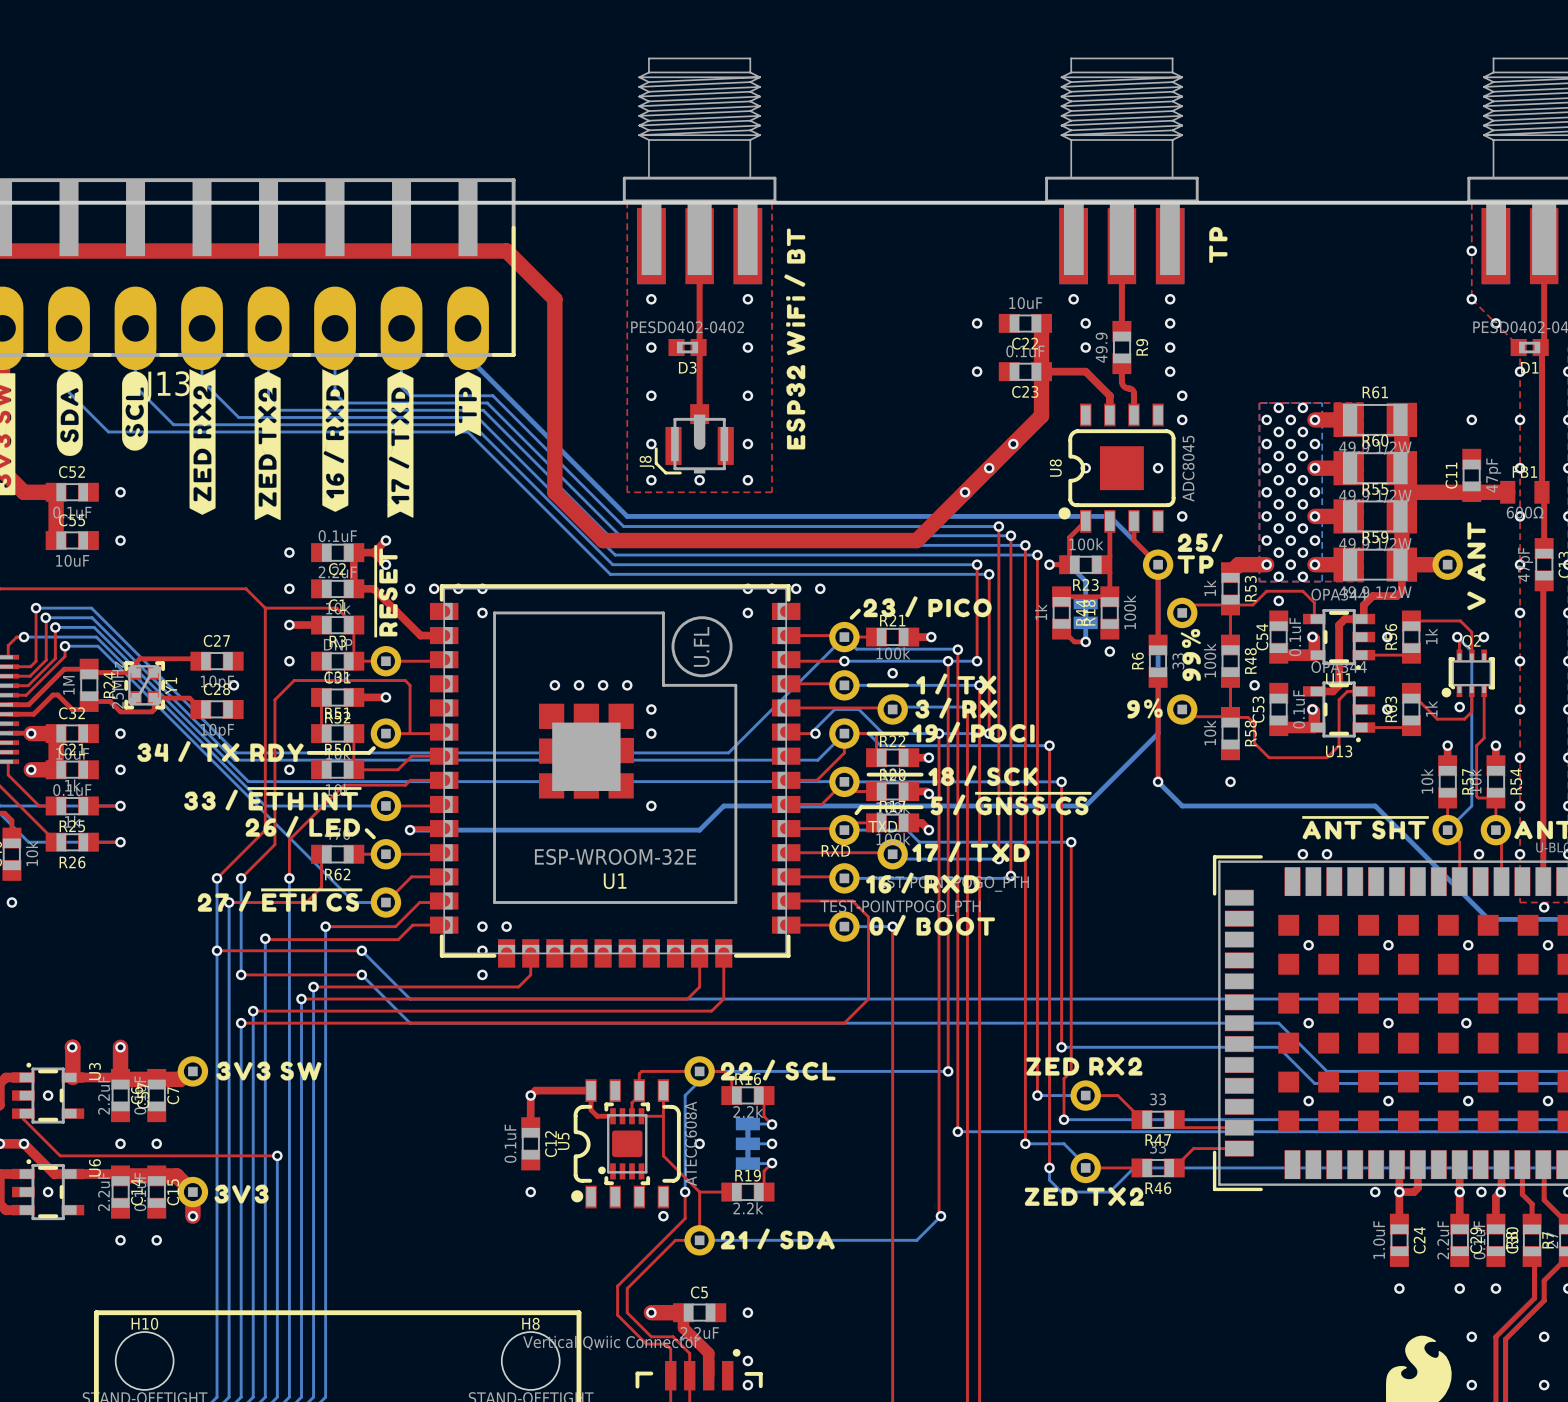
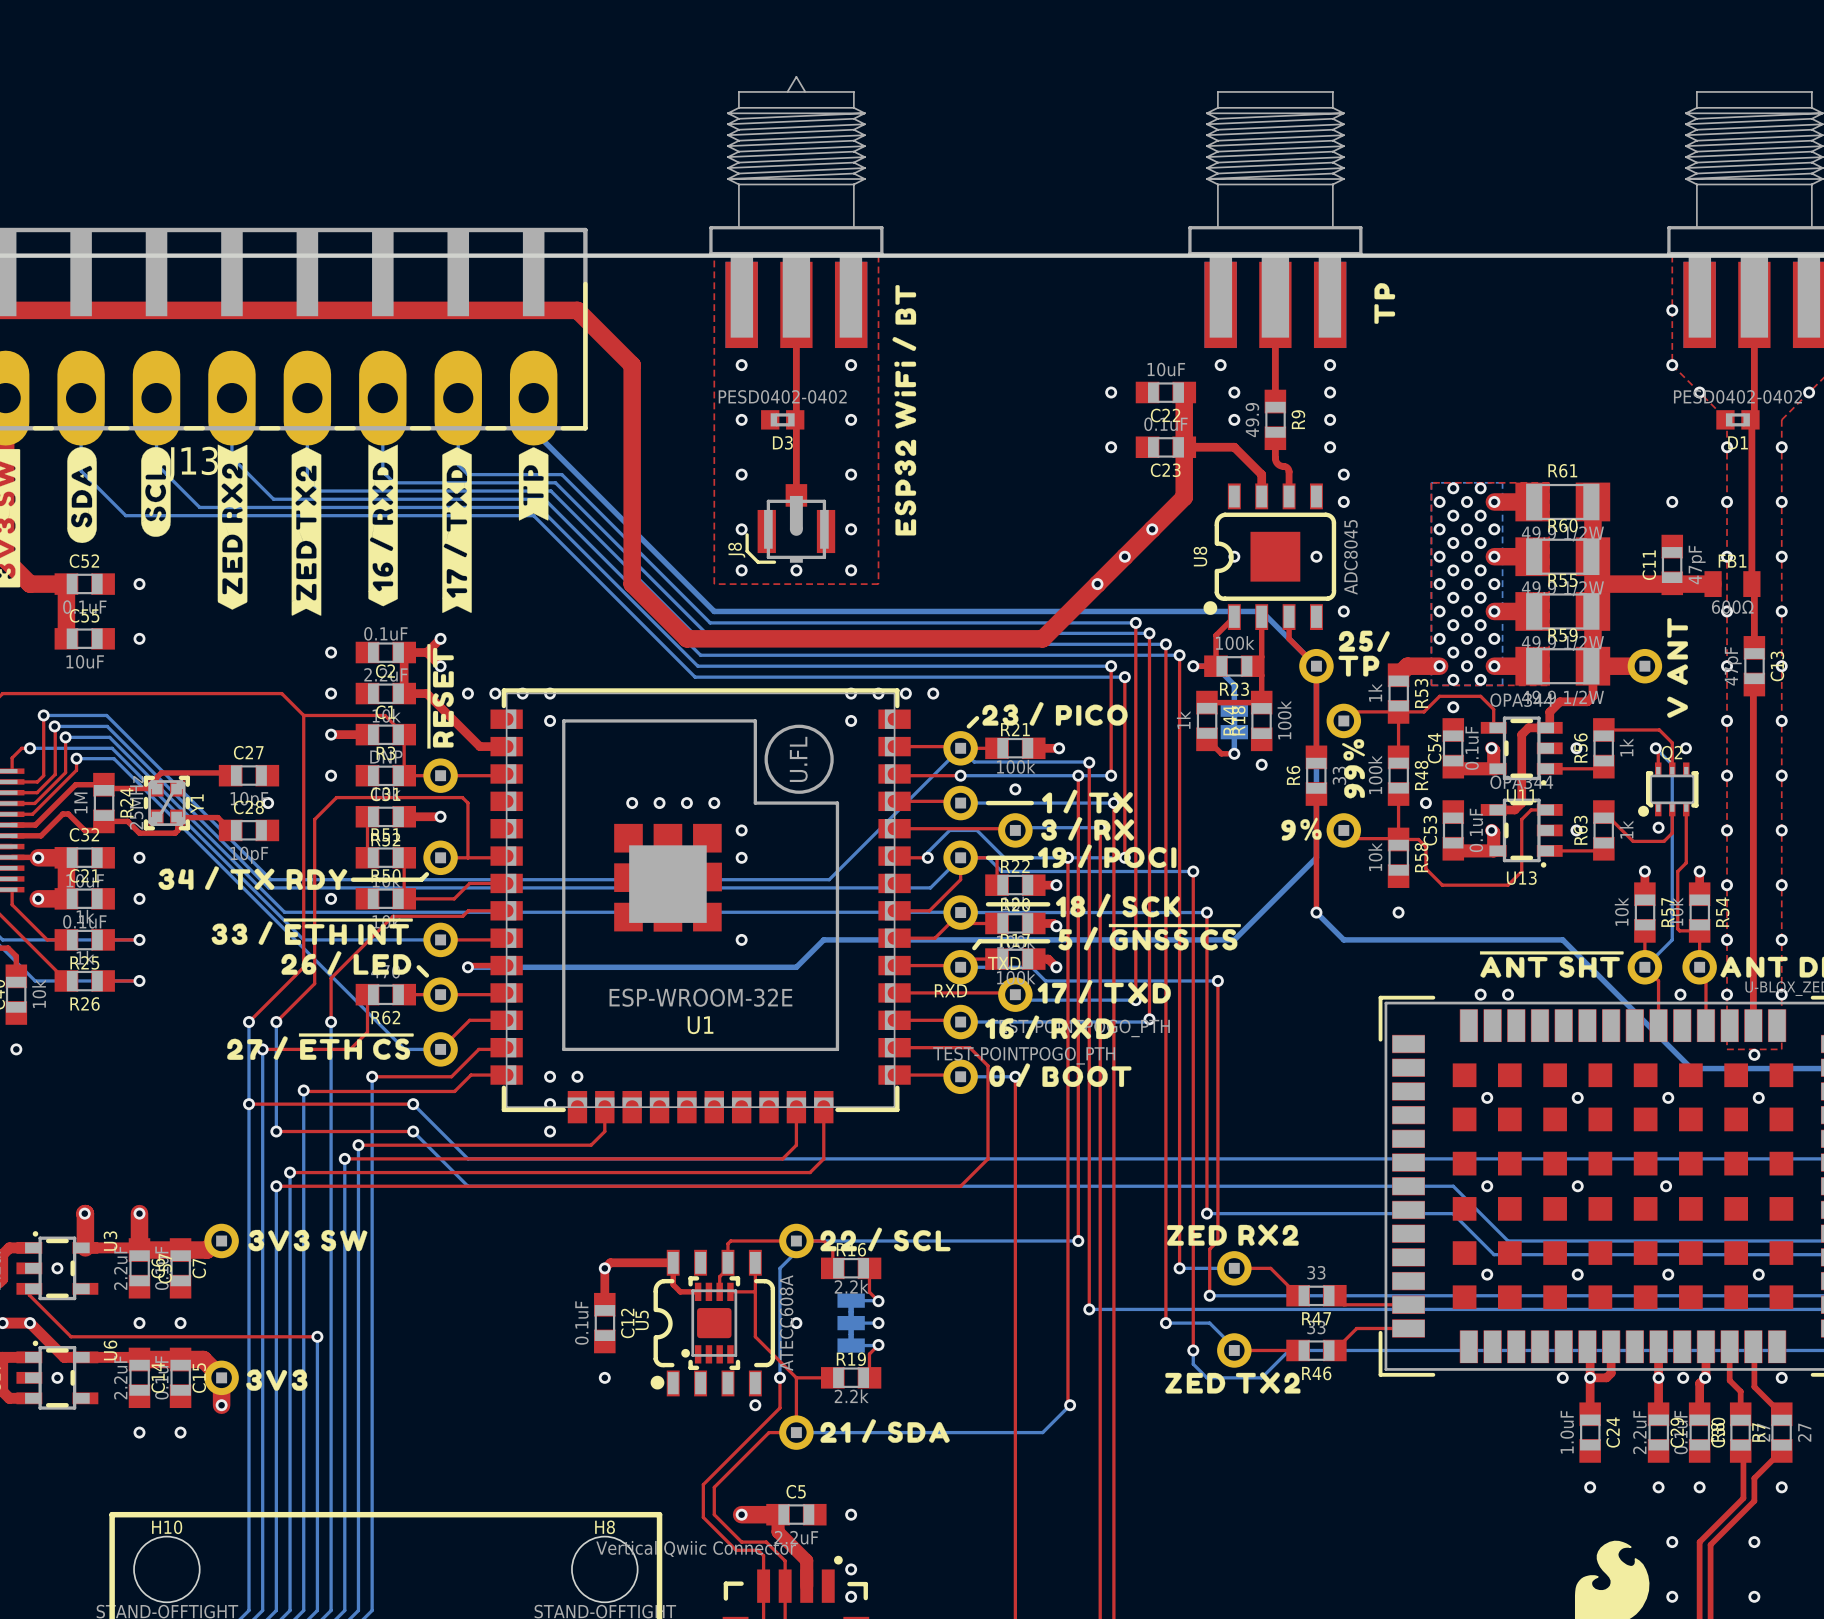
part footprint: [622, 57, 777, 285] -> [709, 76, 884, 349]

